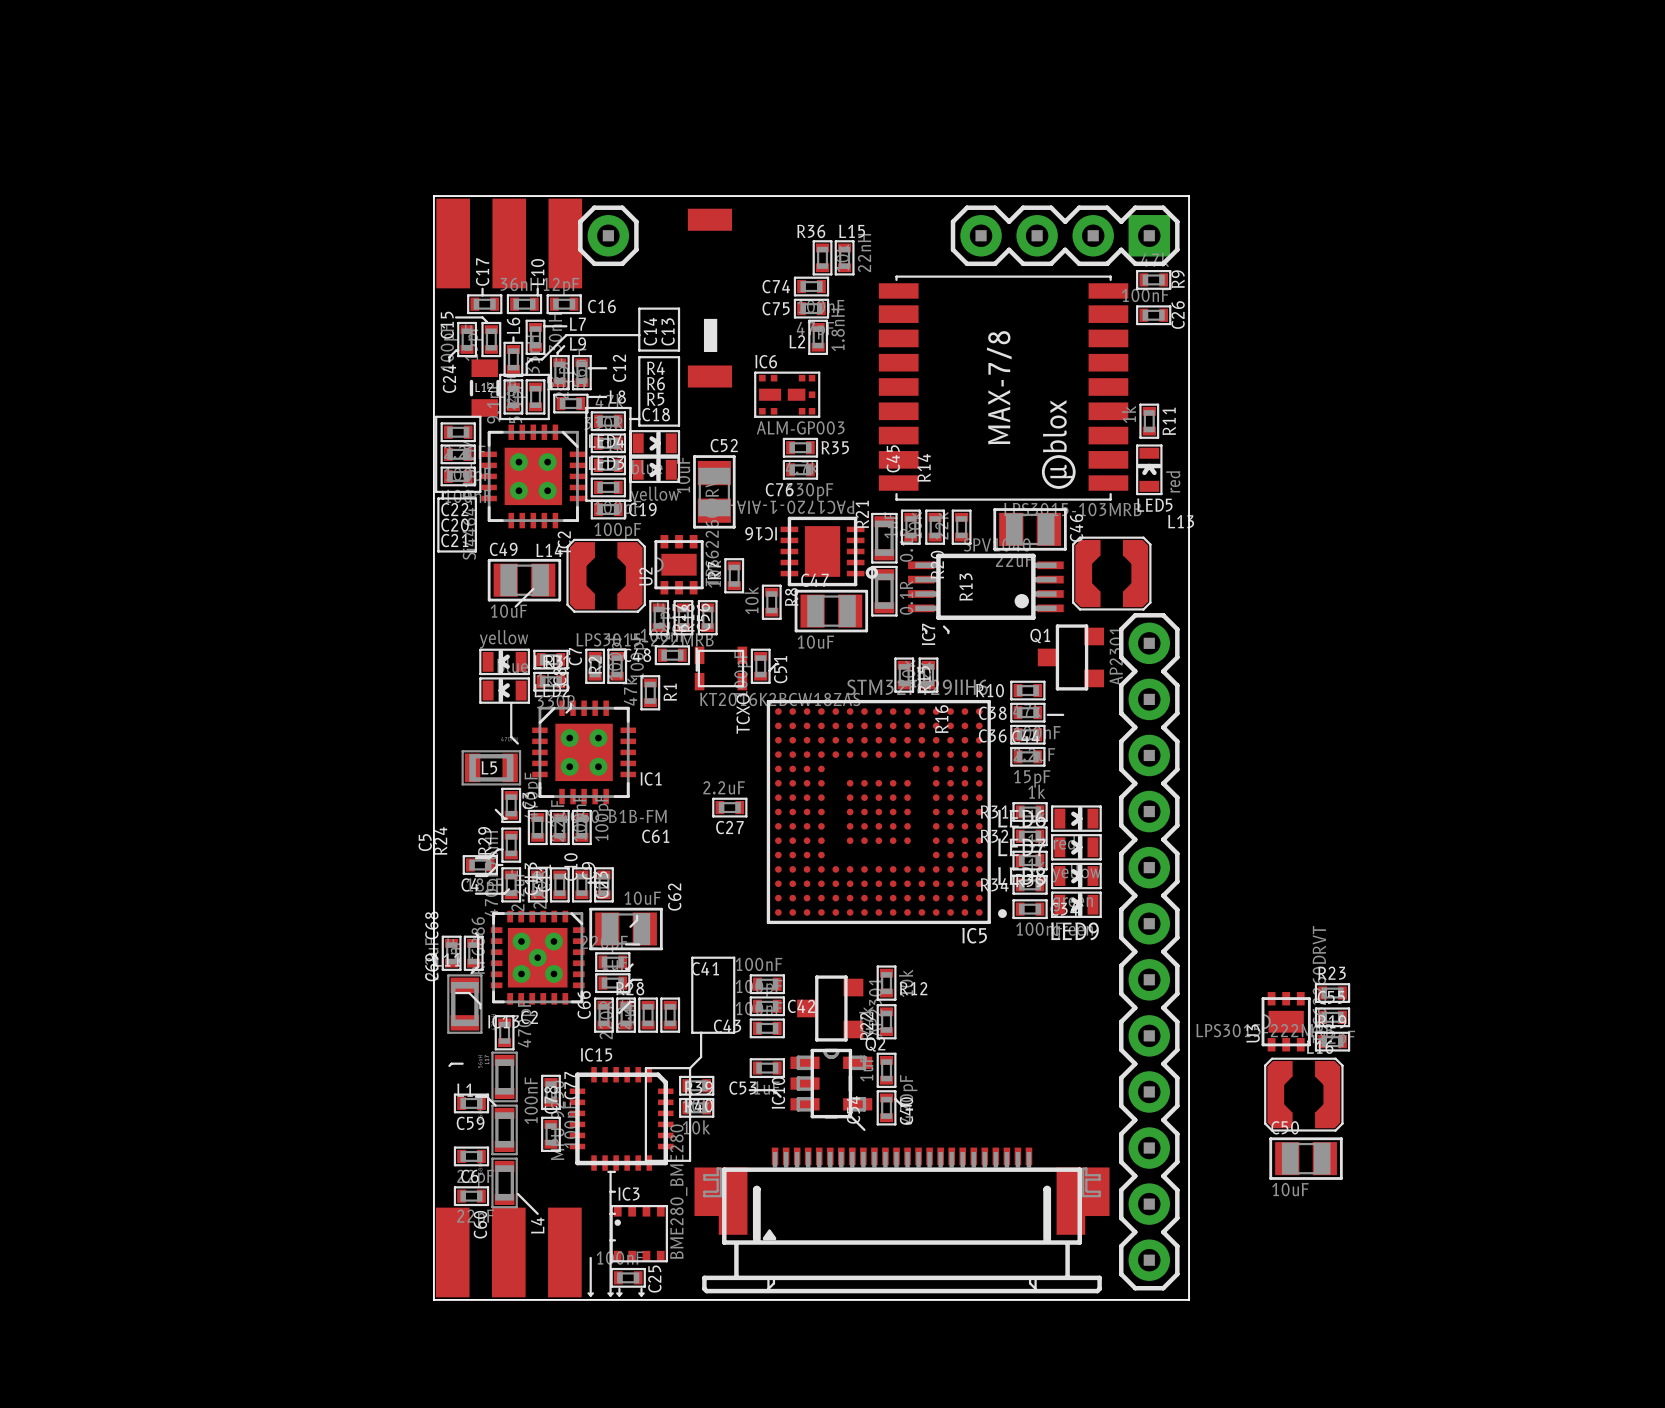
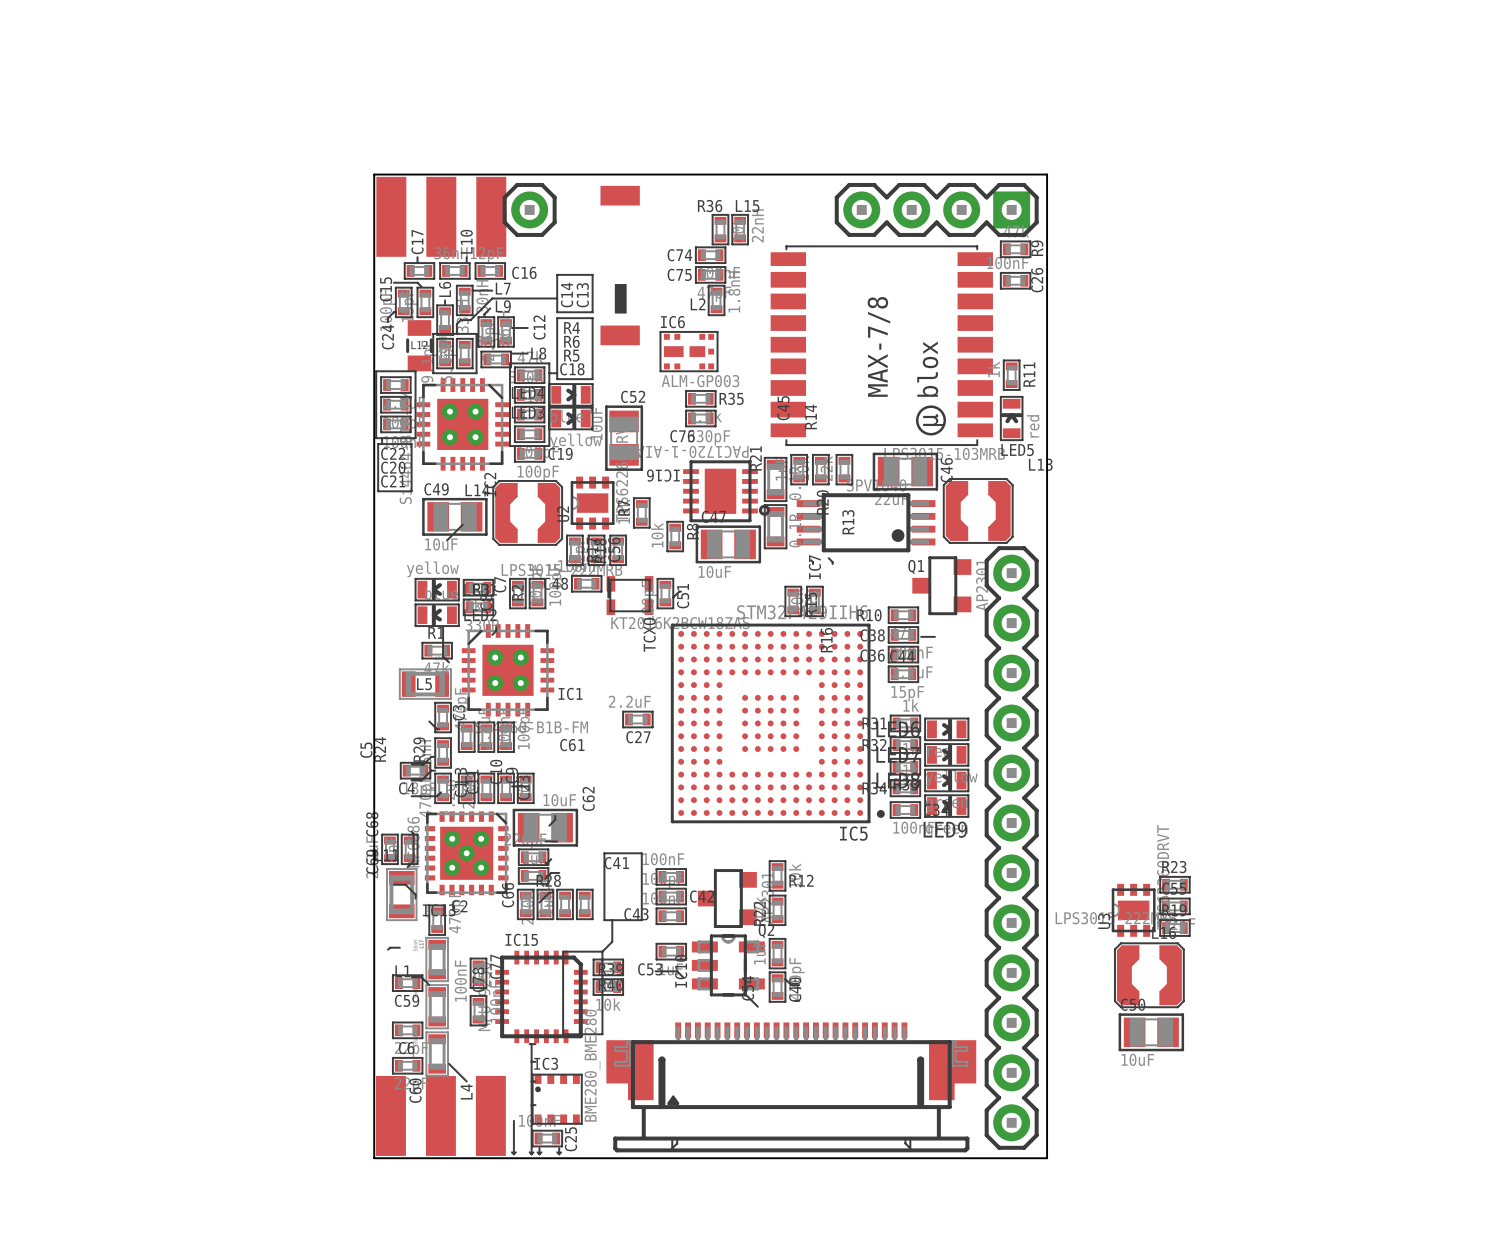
R1 rotation: 0° (650, 692) -> 90° clockwise (437, 650)
R1 position: (650, 692) -> (437, 650)

